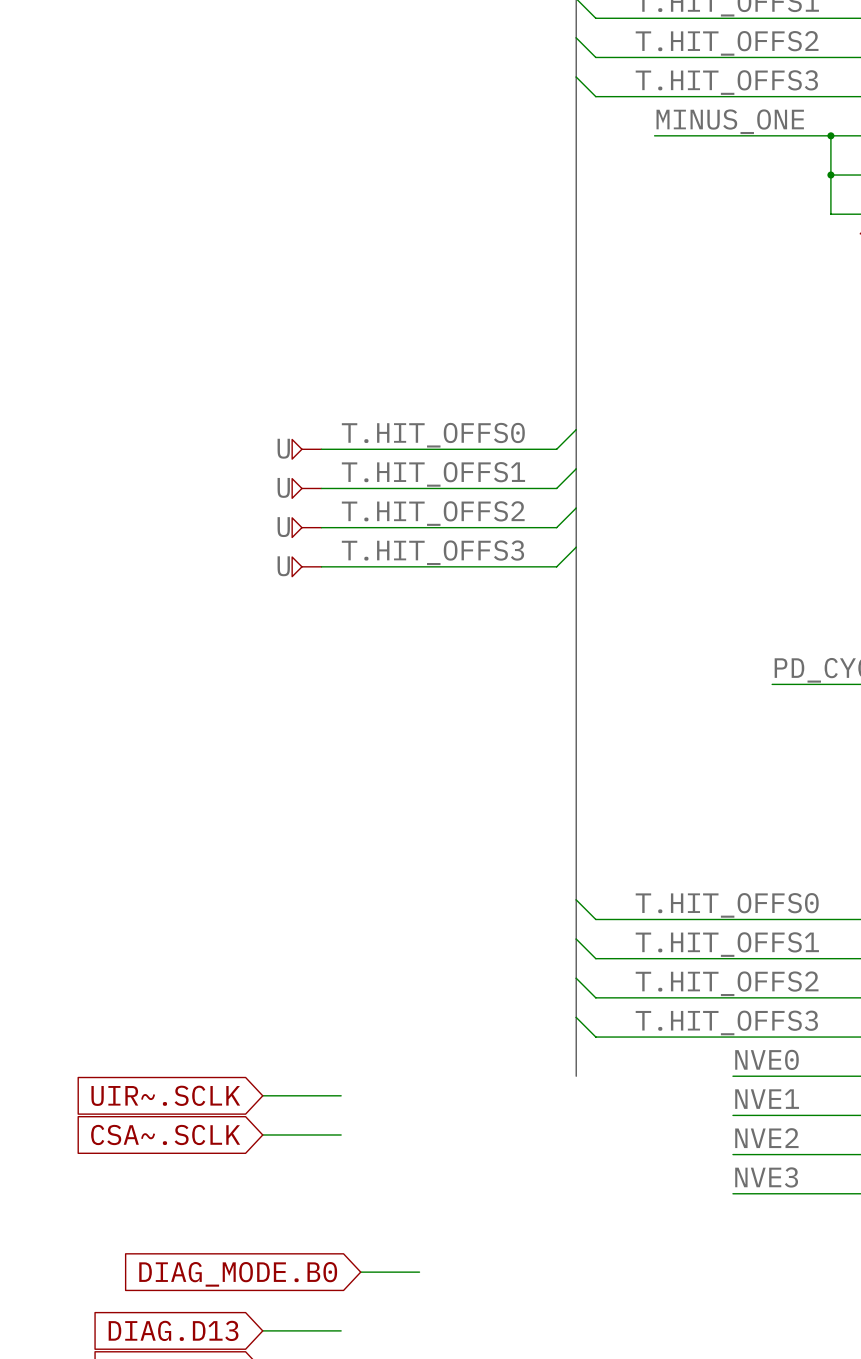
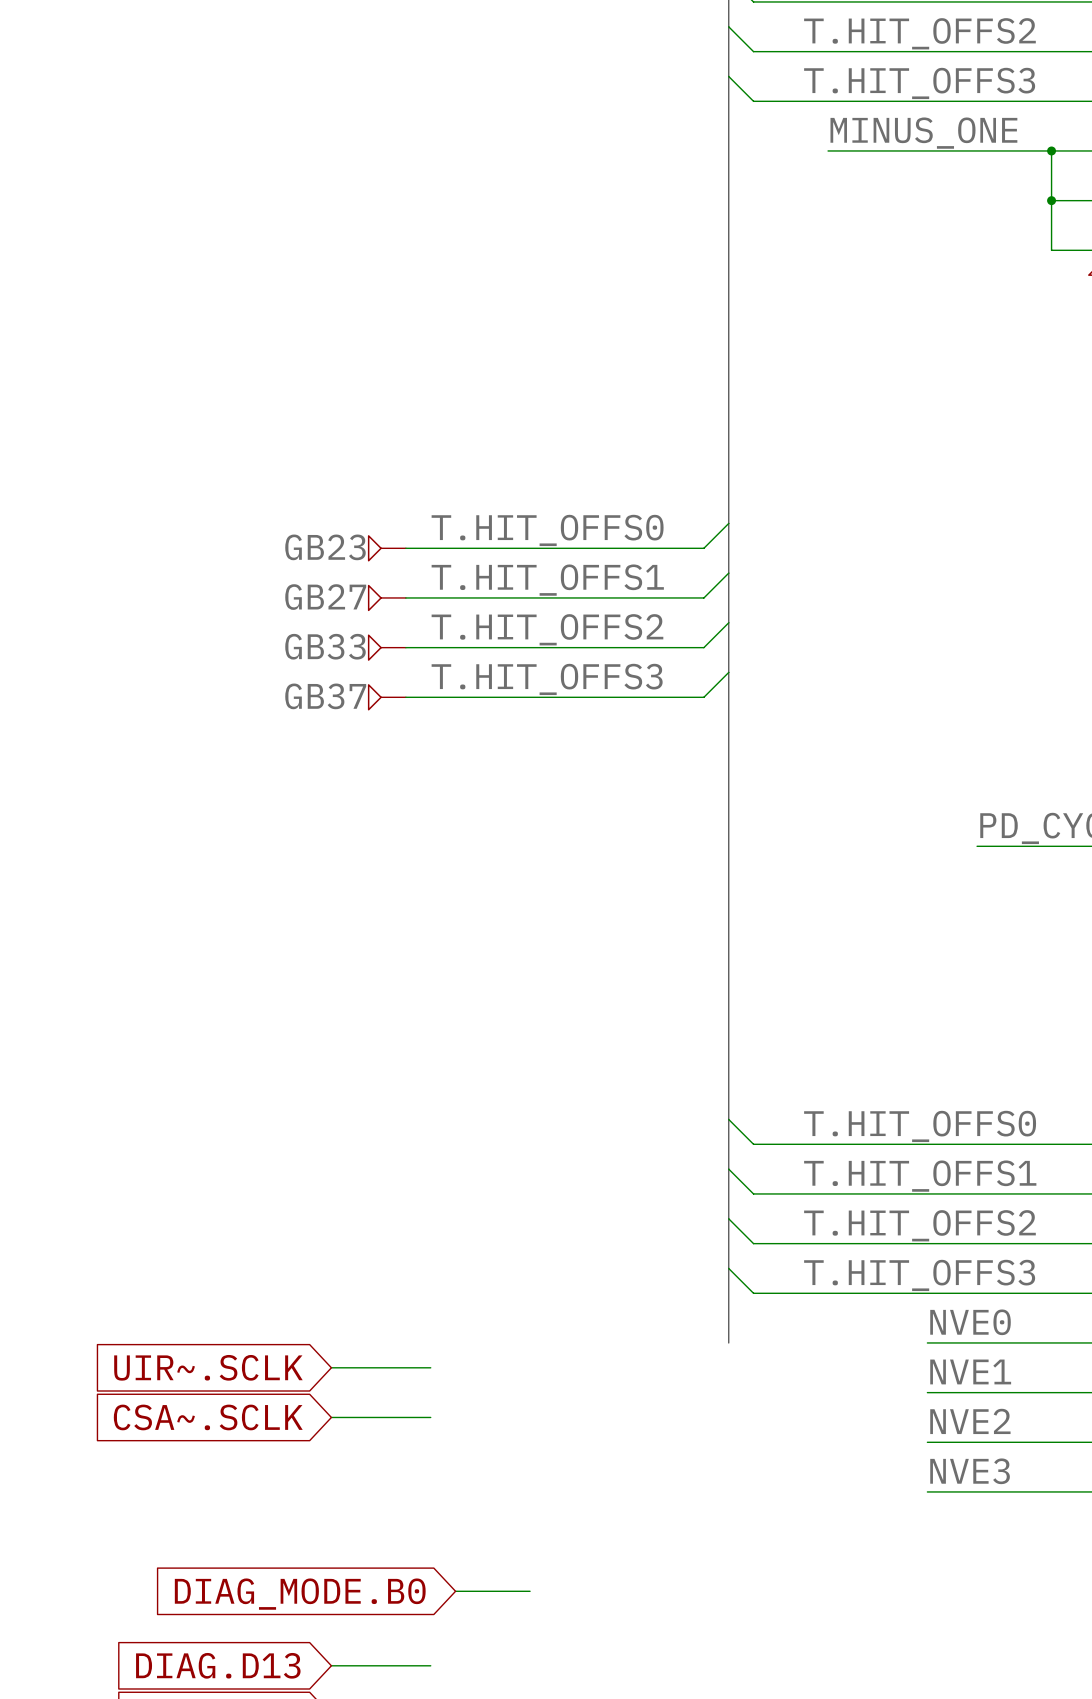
U name: U (283, 448) -> GB23 (325, 547)
U name: U (283, 487) -> GB27 (325, 597)
U name: U (283, 527) -> GB33 (325, 646)
U name: U (283, 566) -> GB37 (325, 696)

